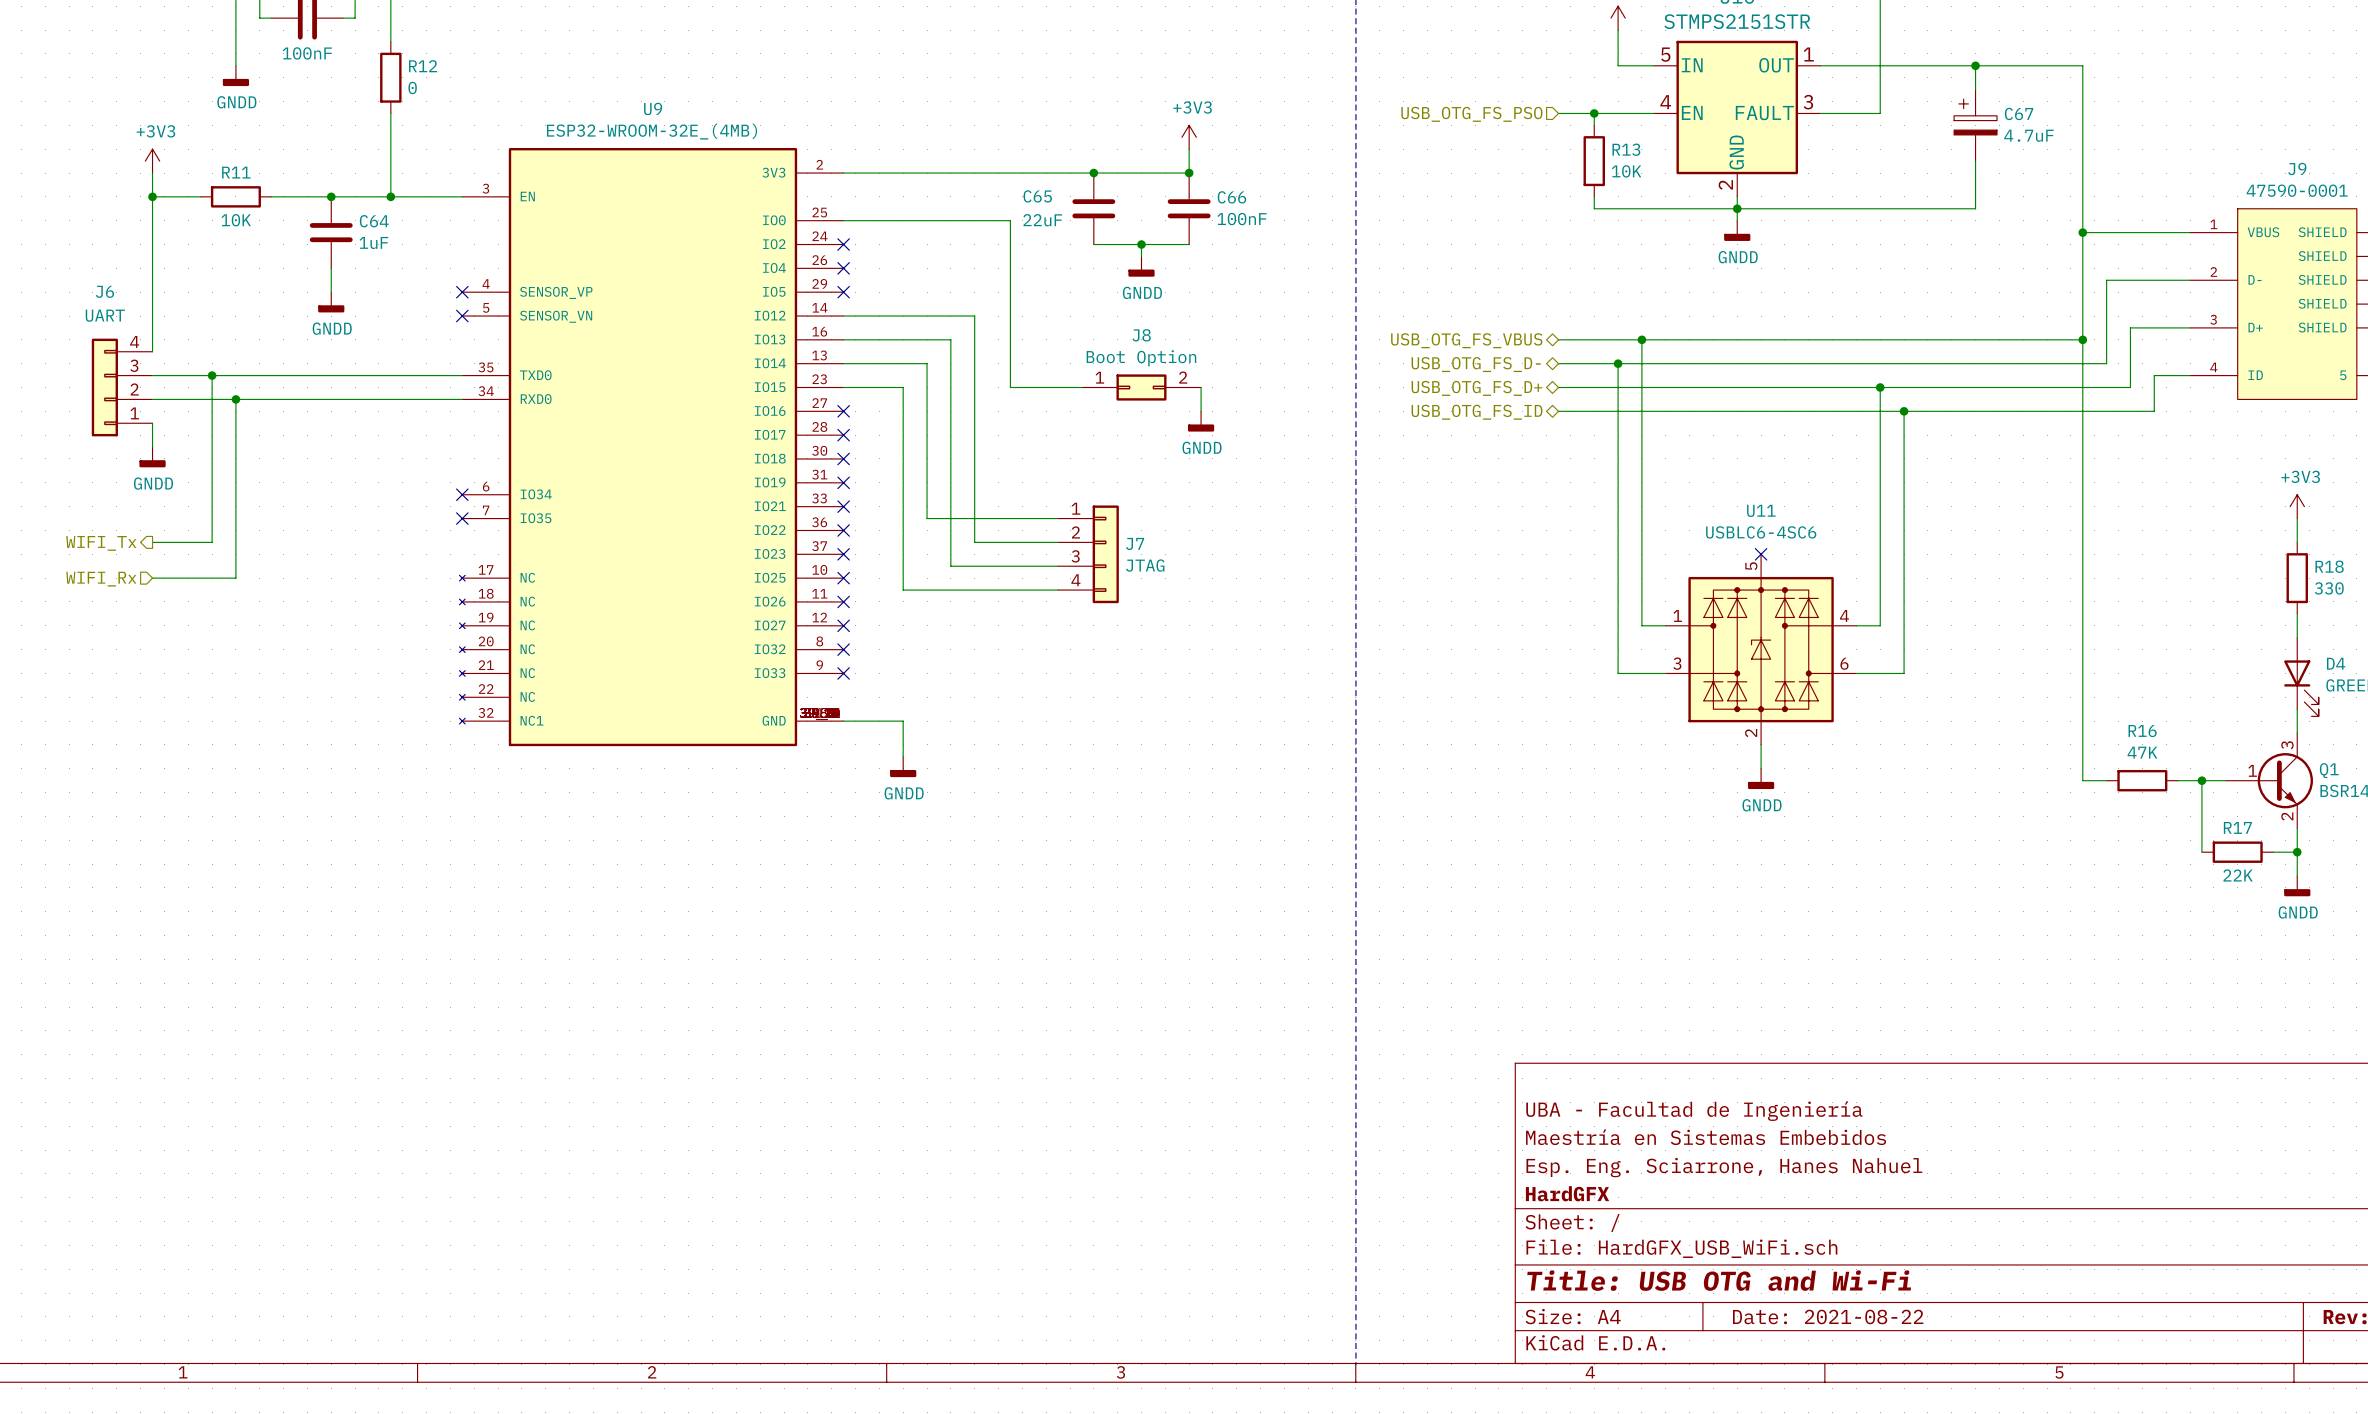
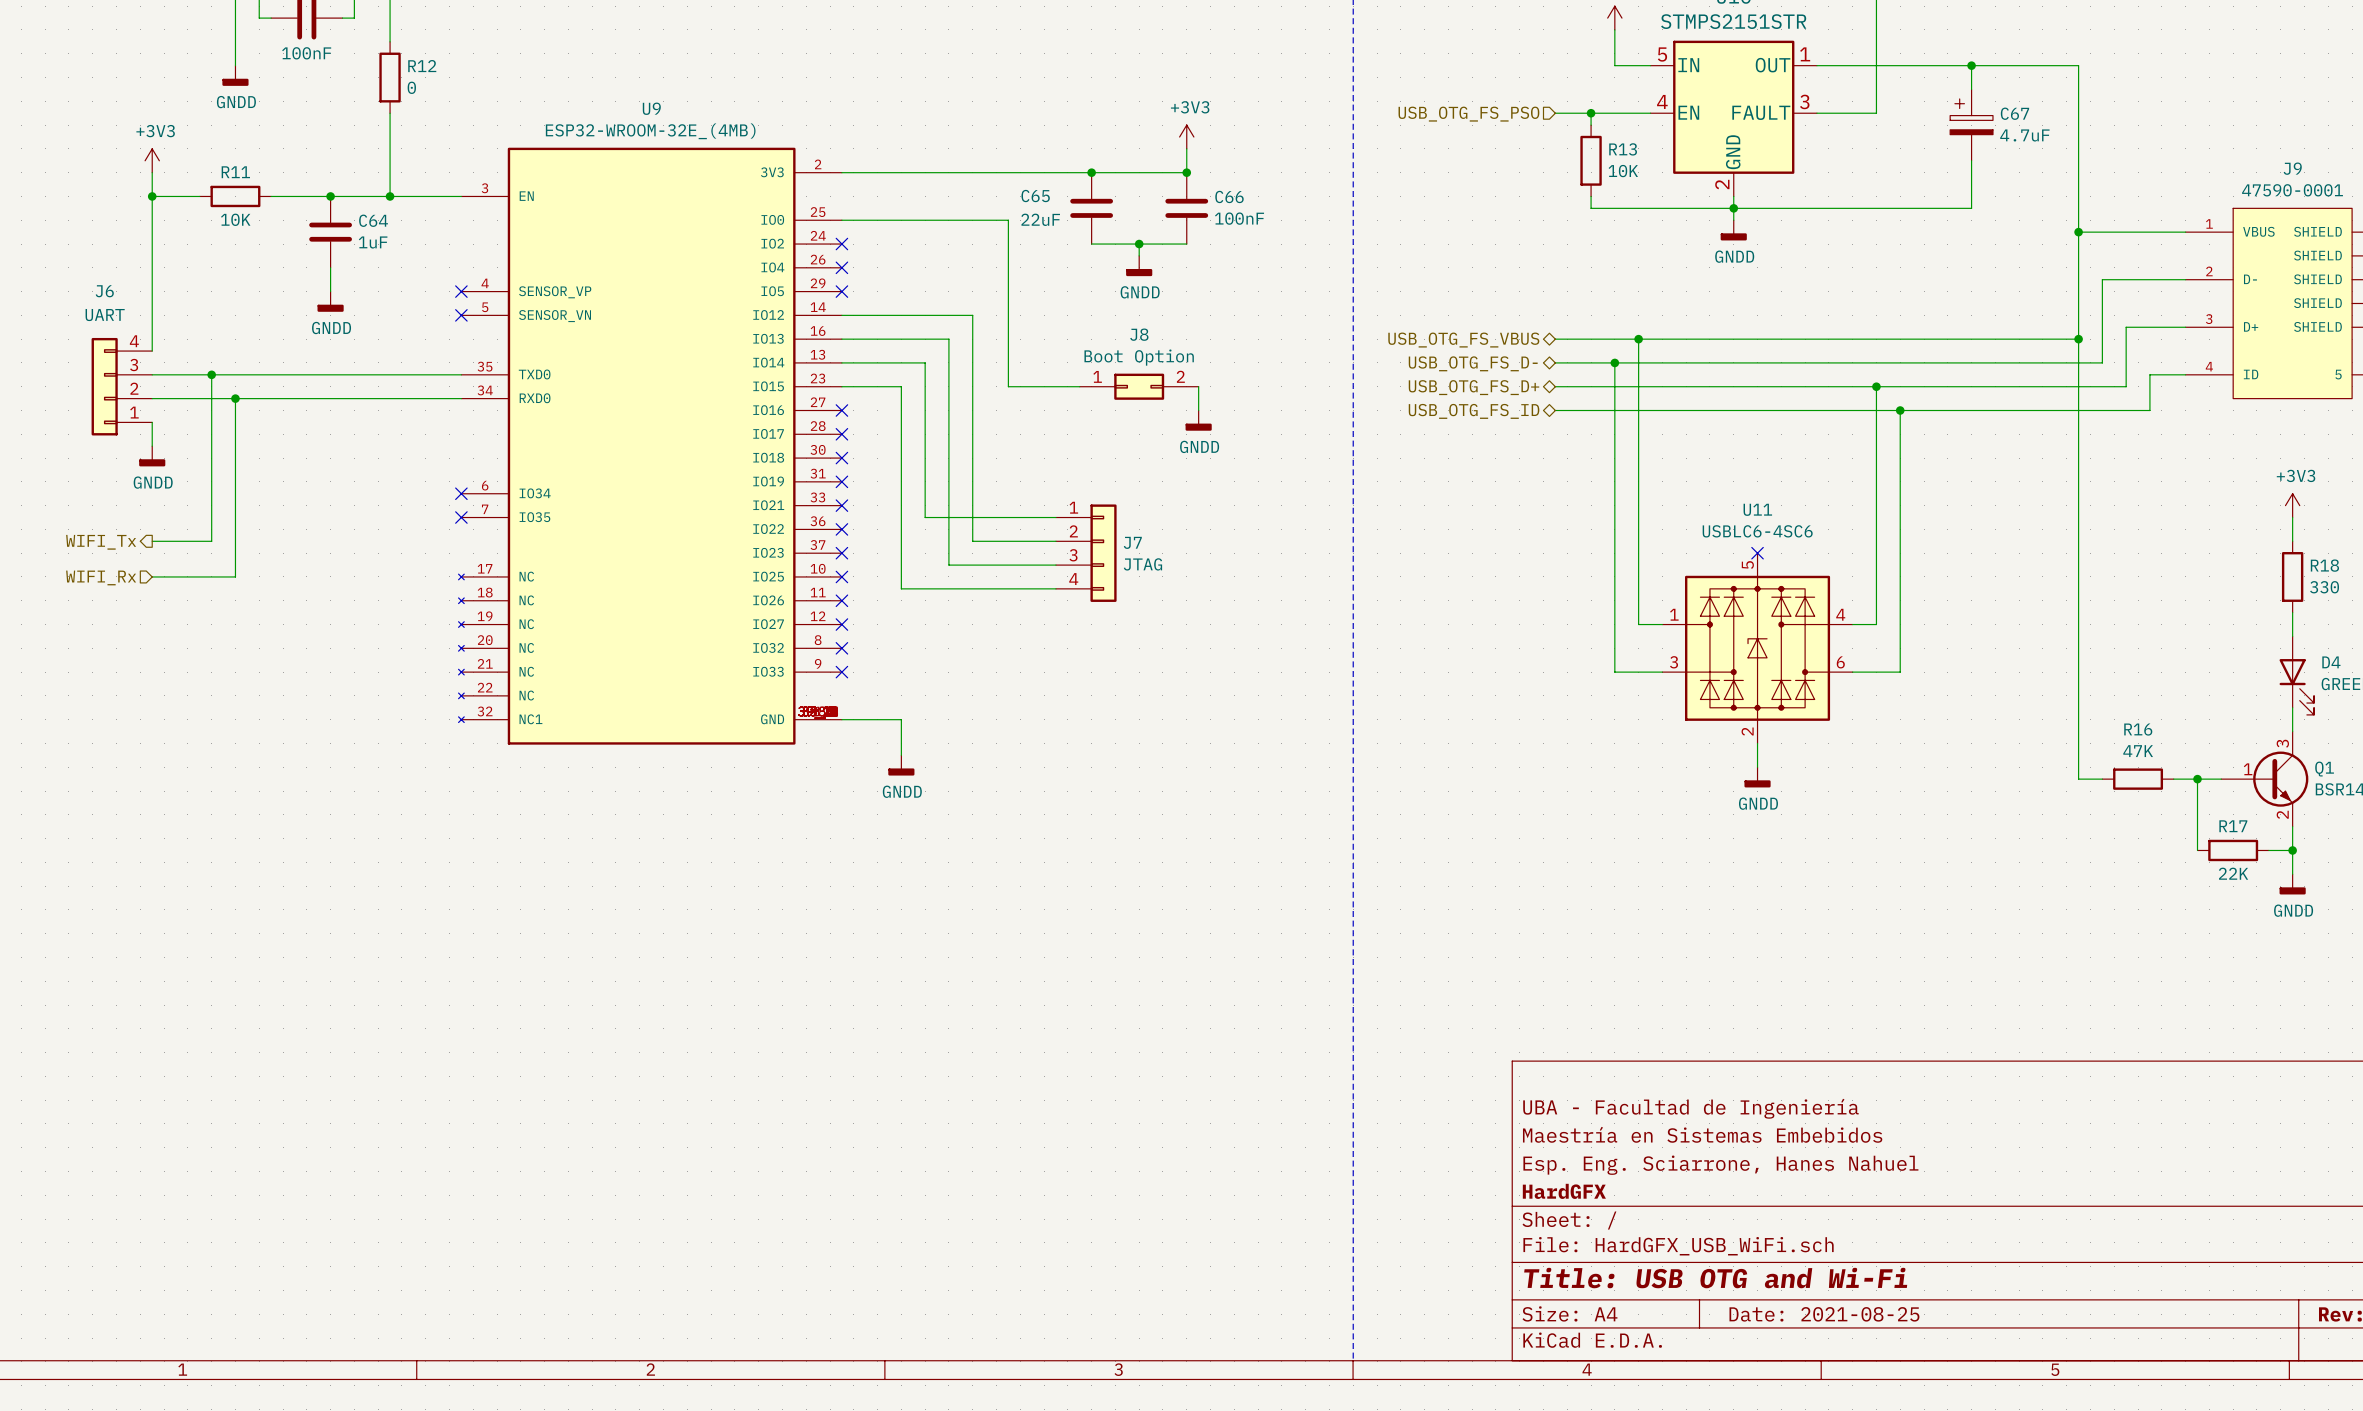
title block: Date: 2021-08-22 (1828, 1316) -> Date: 2021-08-25 (1824, 1314)

